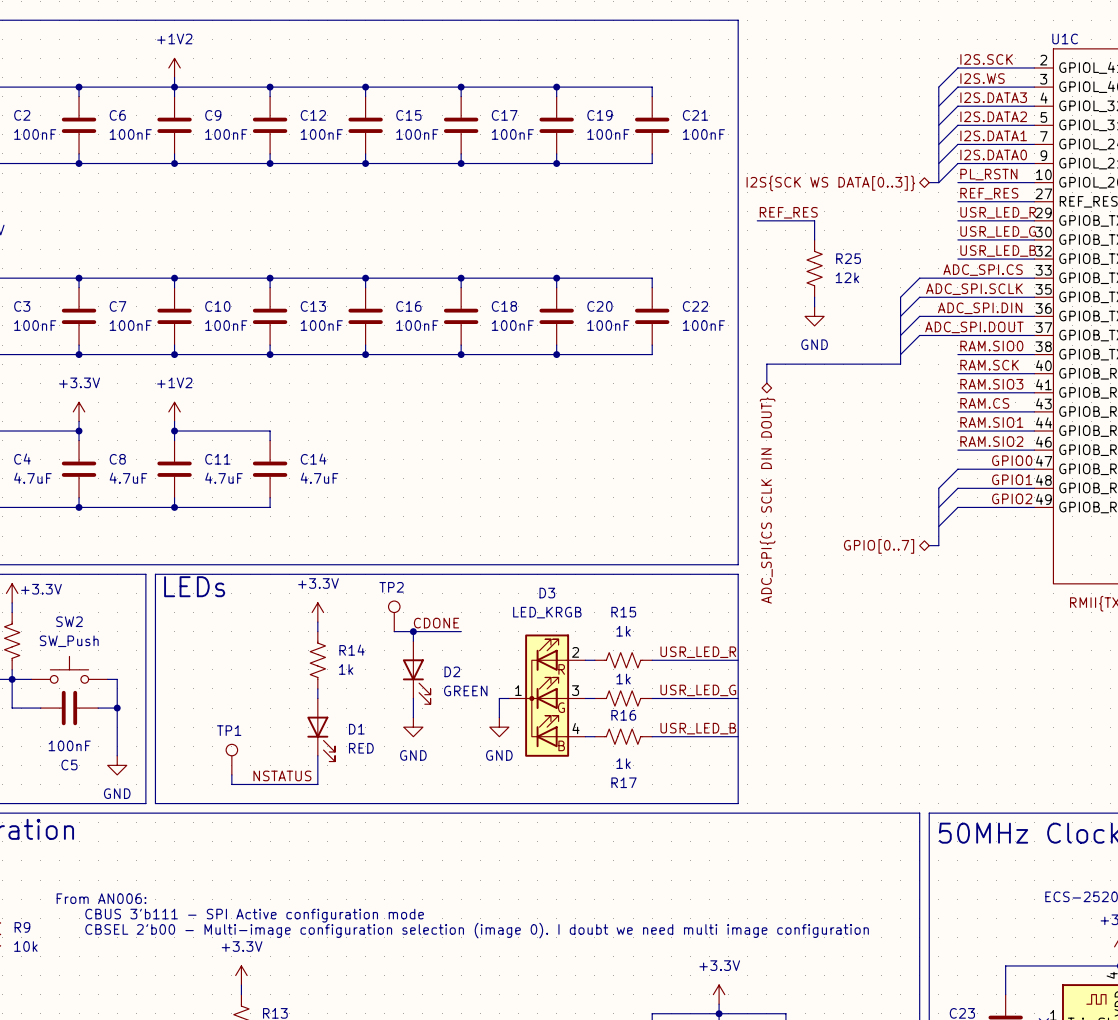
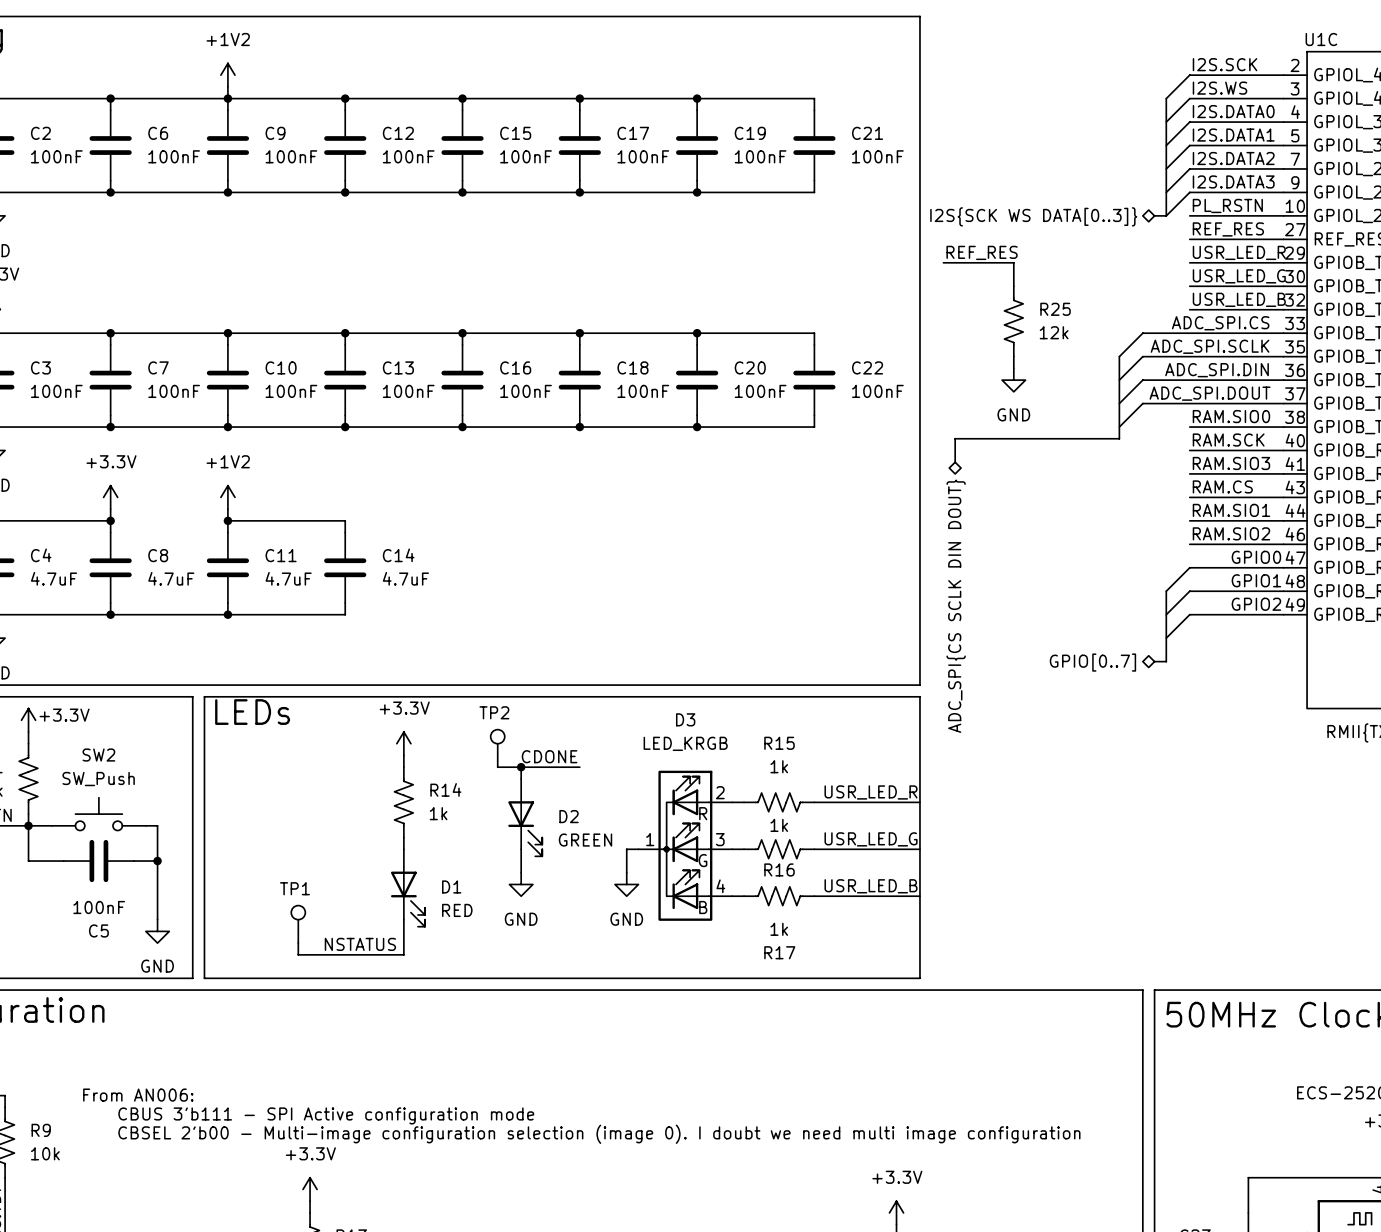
label: I2S.DATA3 (993, 97) -> I2S.DATA0 (1233, 111)
label: I2S.DATA2 (993, 116) -> I2S.DATA1 (1233, 135)
label: I2S.DATA1 (993, 135) -> I2S.DATA2 (1233, 158)
label: I2S.DATA0 (993, 154) -> I2S.DATA3 (1233, 181)

